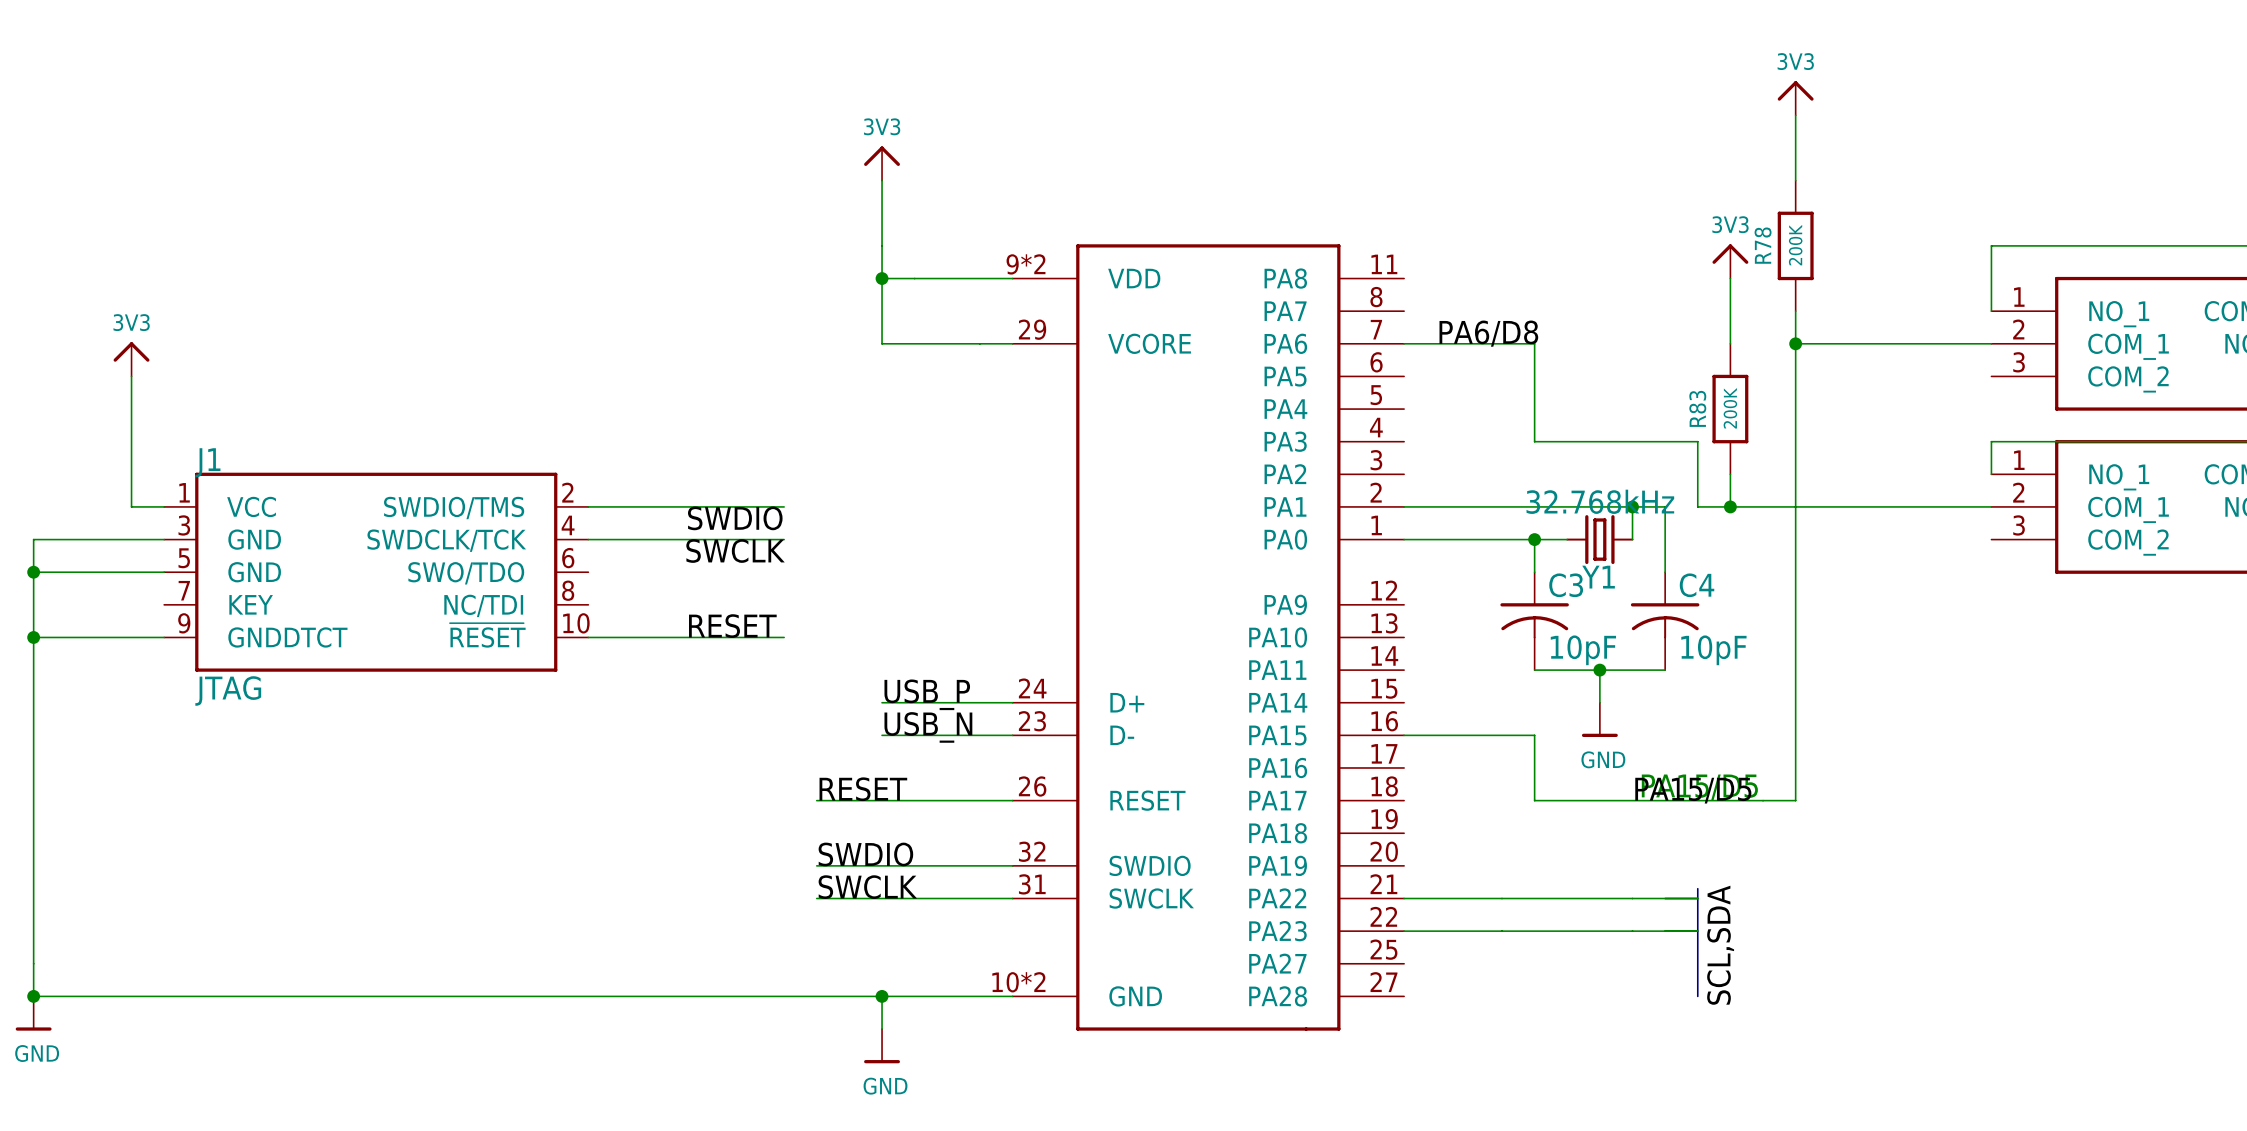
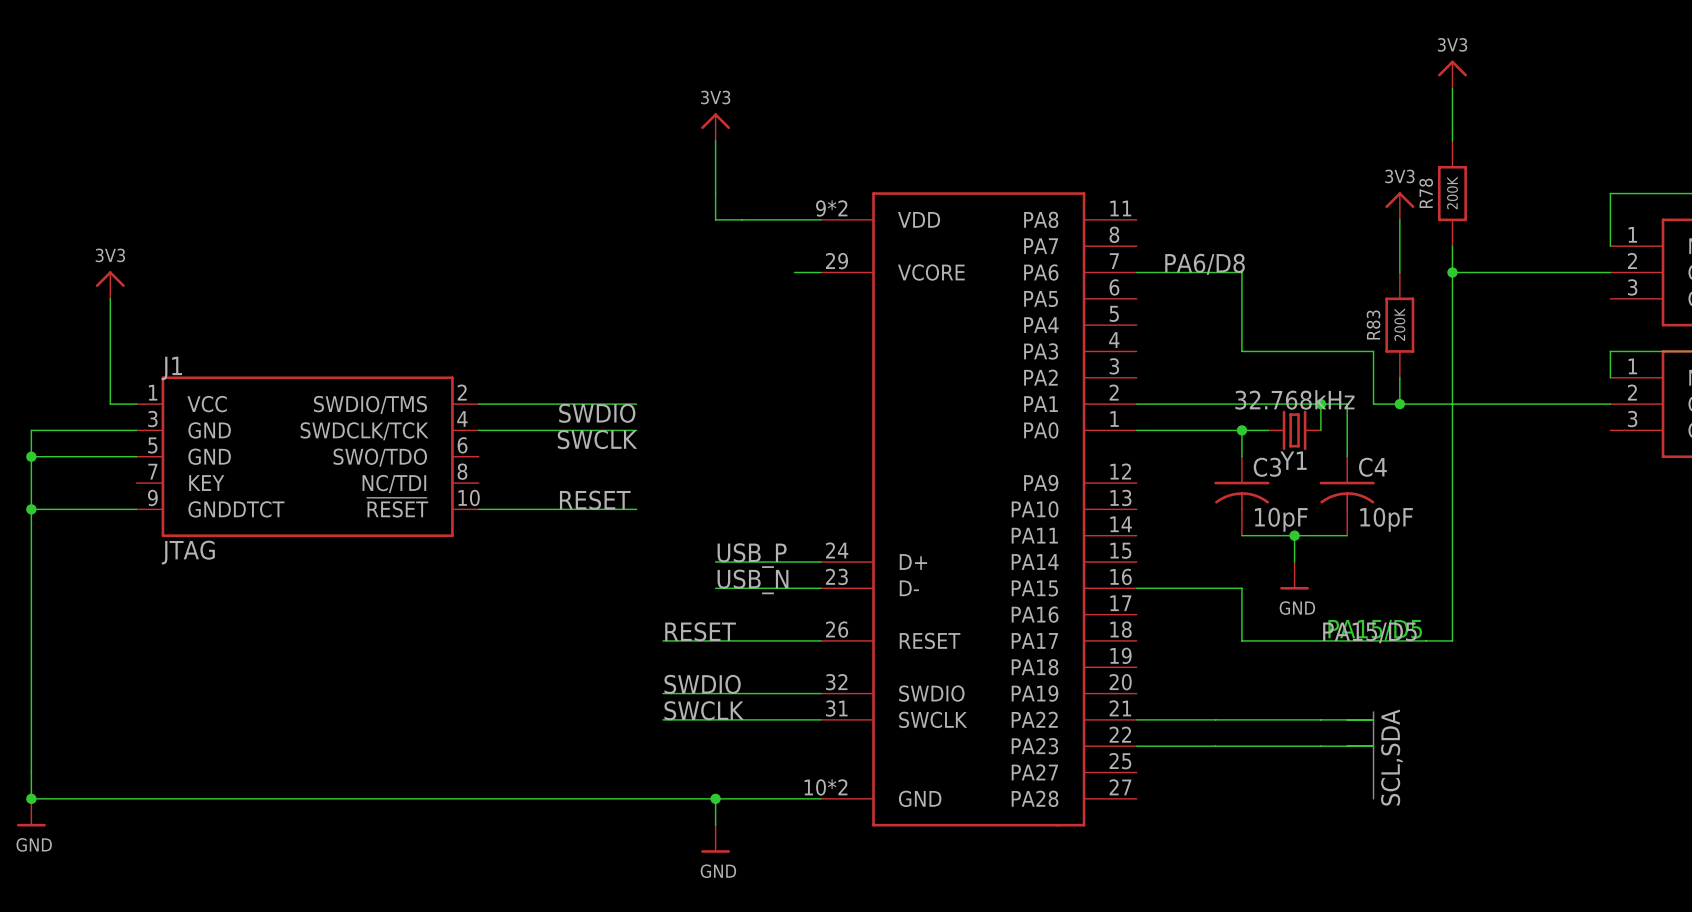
wire: (882, 278) (882, 343) (979, 343) -> none
junction: (882, 278) -> none

